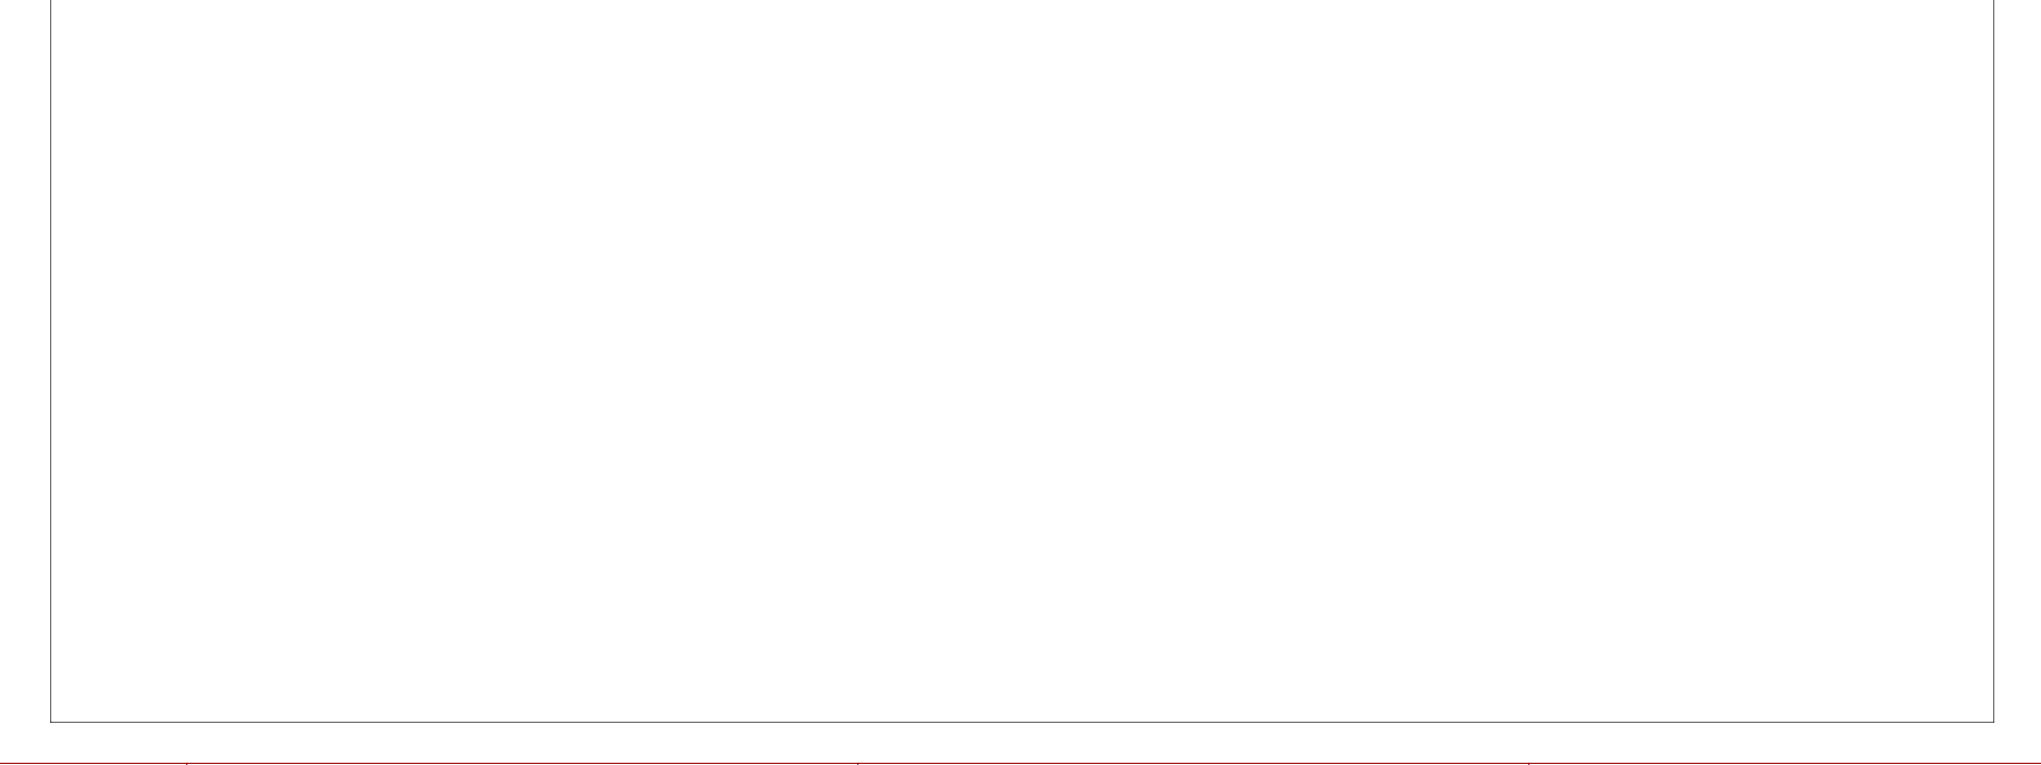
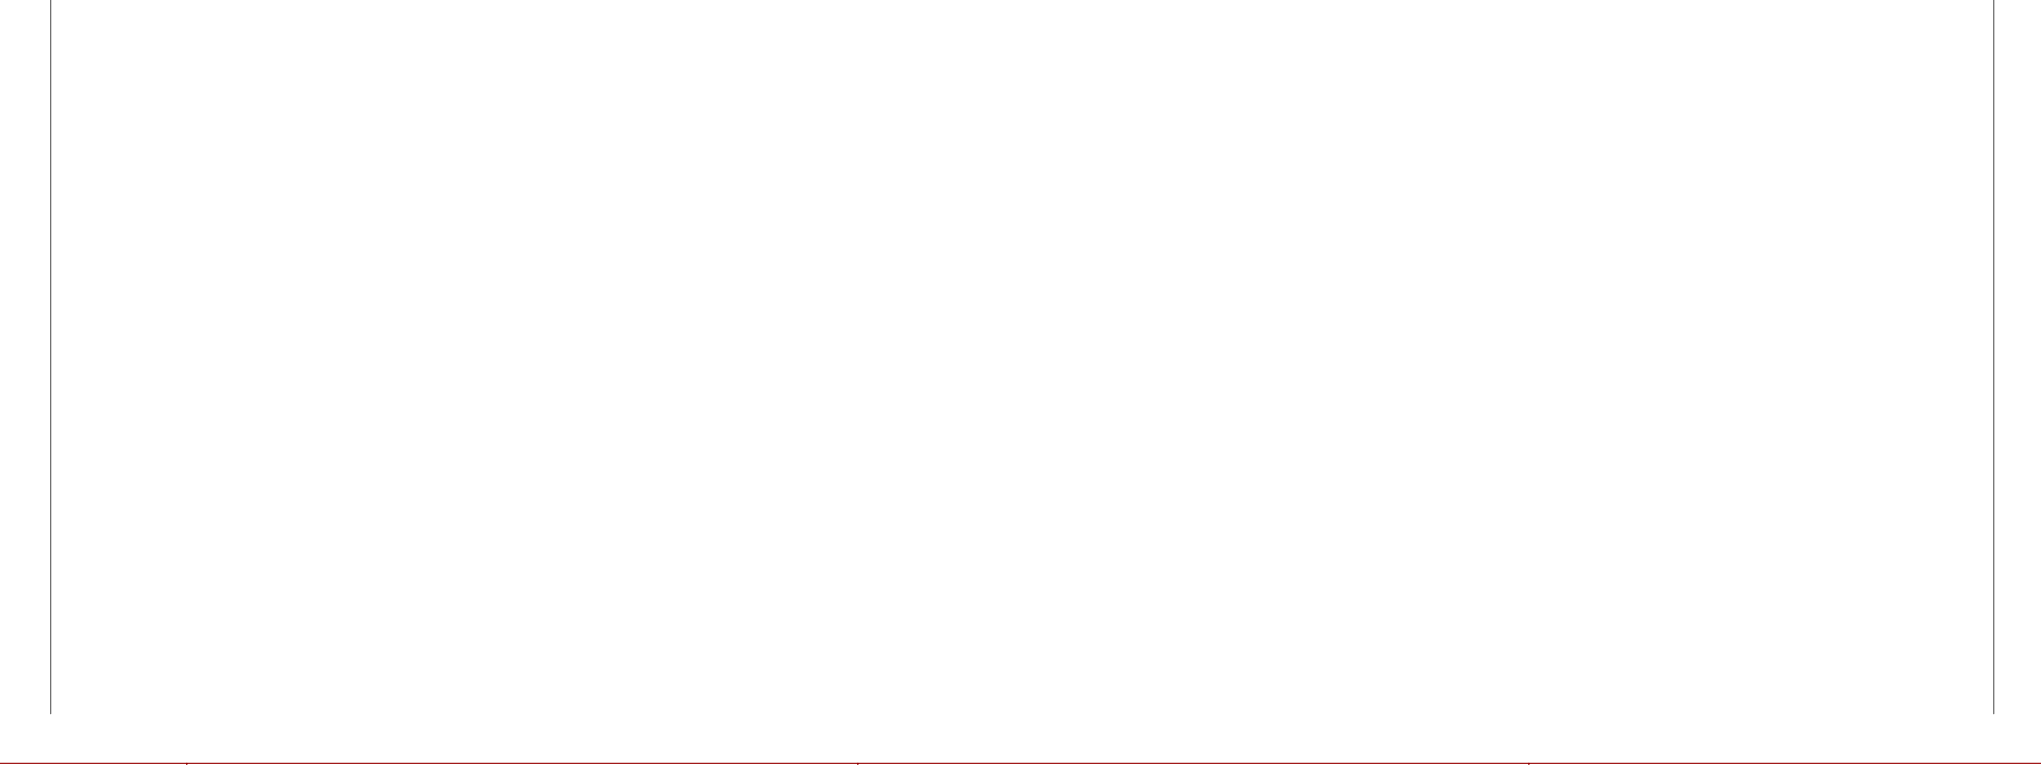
line: (50, 713) (50, 722) (1993, 722) (1993, 713) -> none

